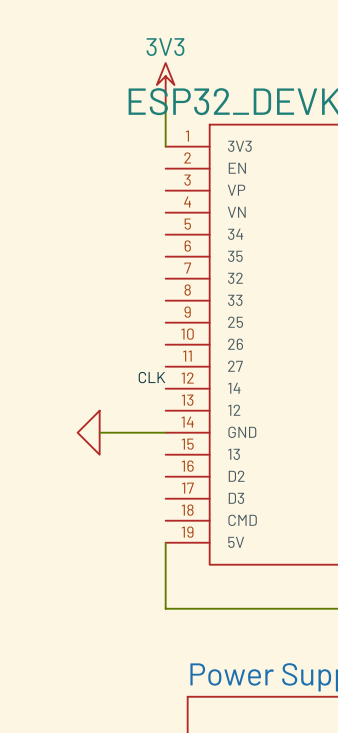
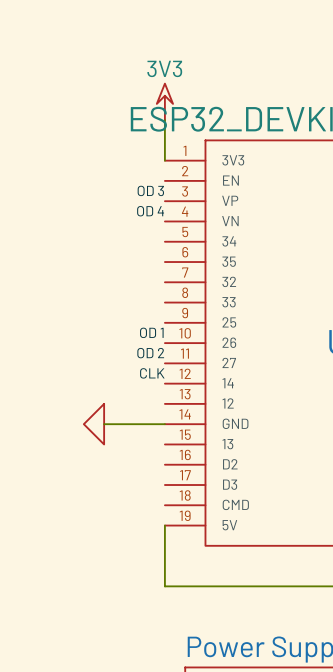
label: none -> OD 3 (150, 190)
label: none -> OD 4 (150, 211)
label: none -> OD 1 (151, 332)
label: none -> OD 2 (150, 353)

